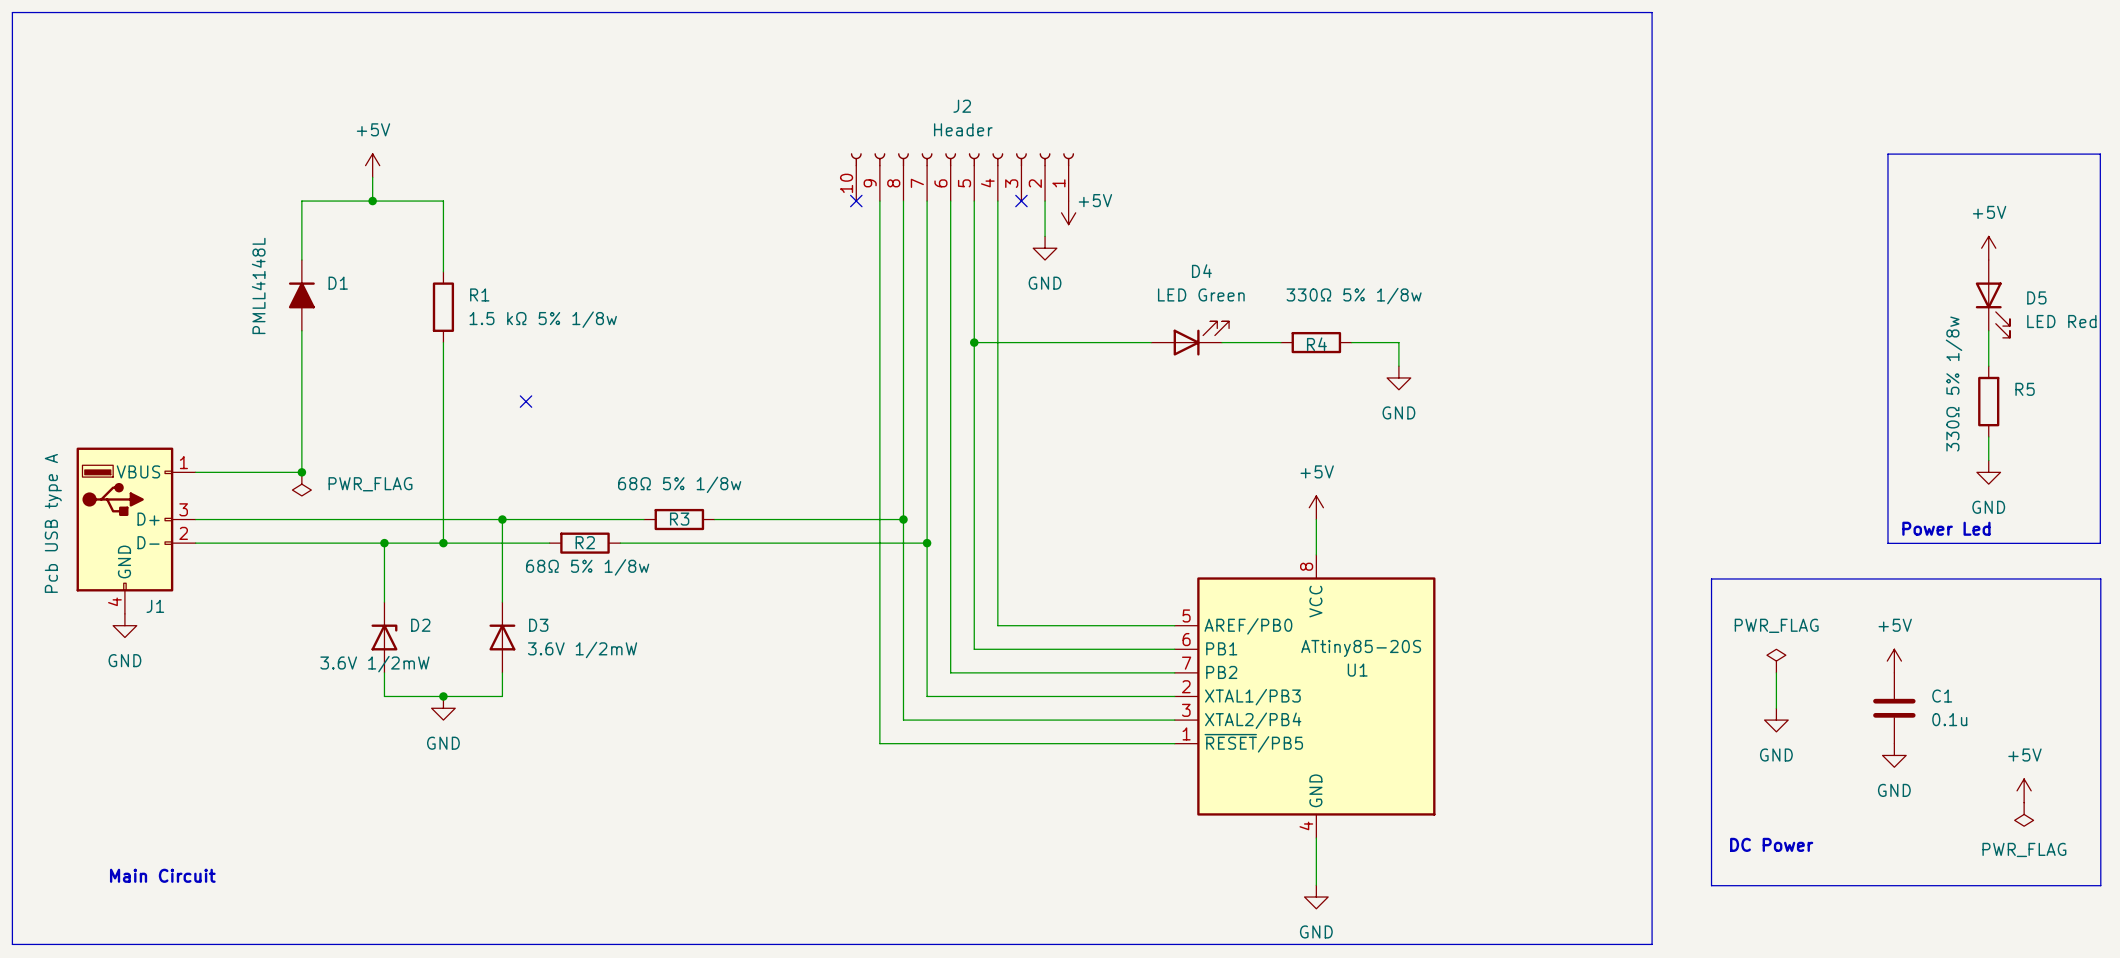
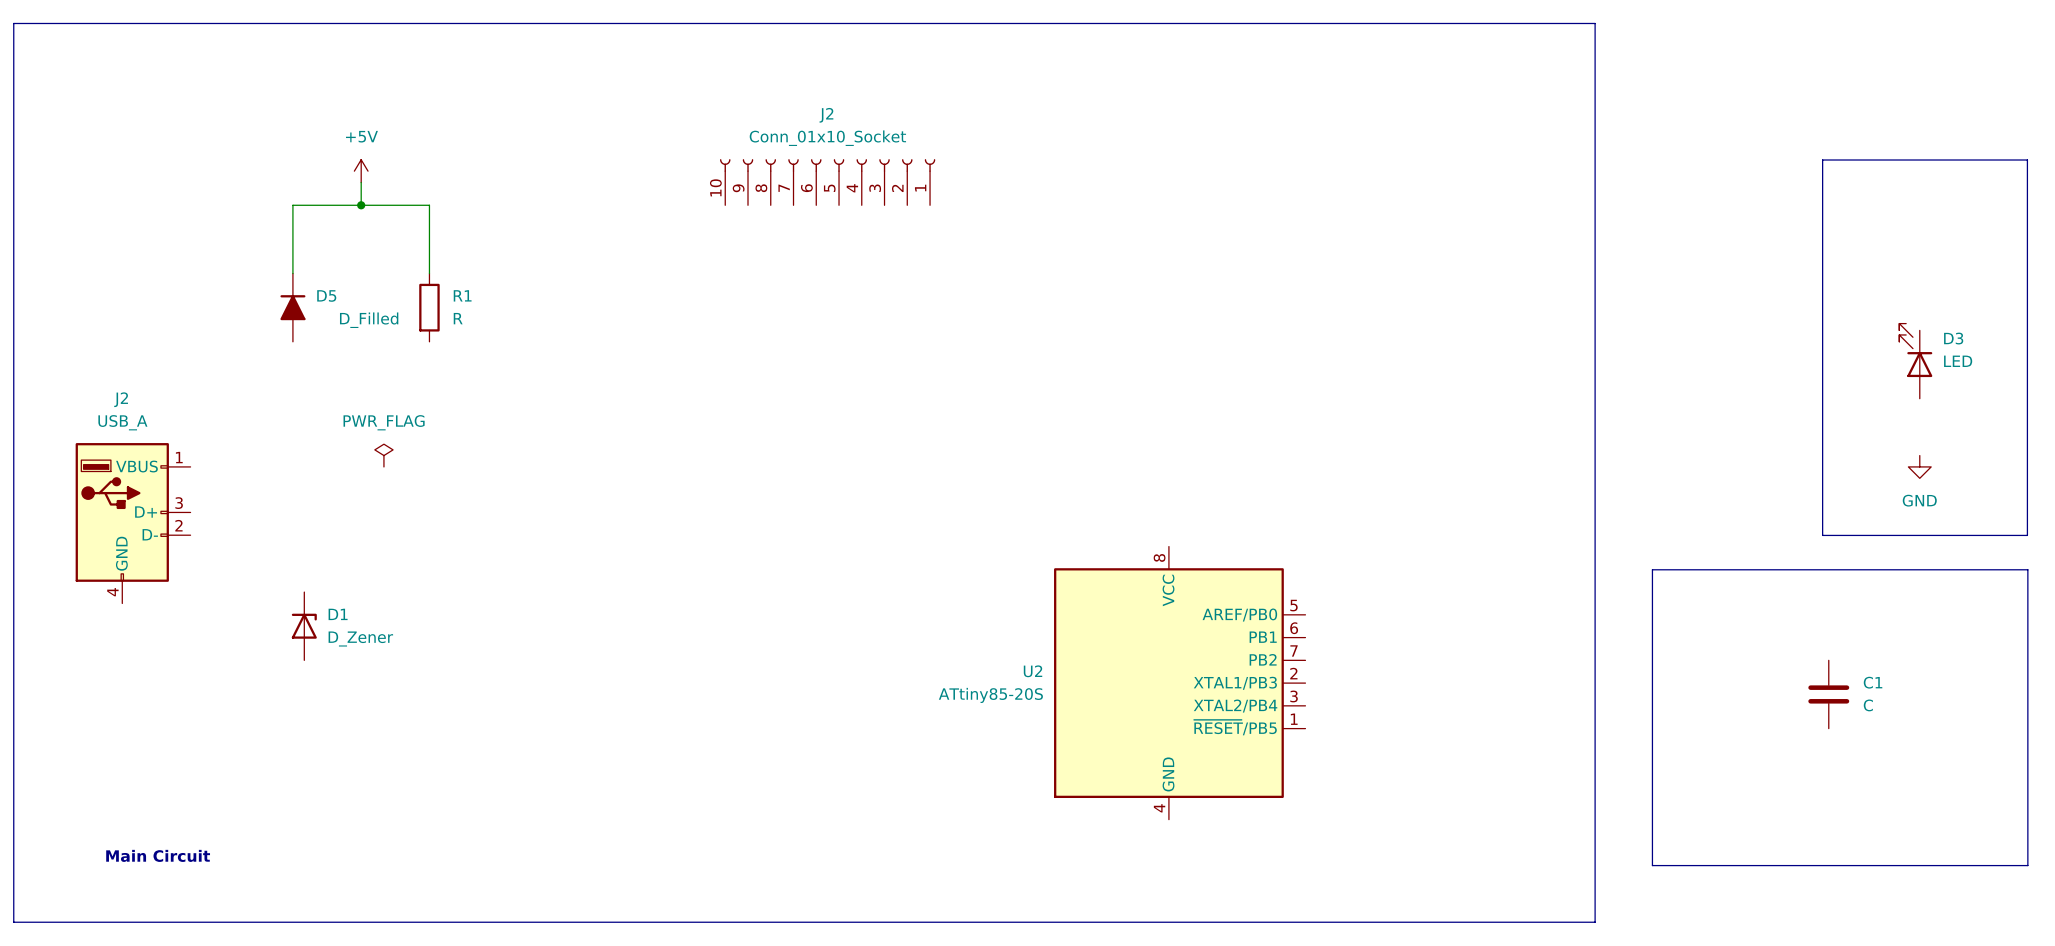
J2: none -> Conn_01x10_Socket (827, 182)
J2: Header (962, 177) -> none
no-connect mark: (856, 201) -> none
wire: (879, 201) (879, 743) (1174, 743) -> none
wire: (903, 201) (903, 720) (1174, 720) -> none
wire: (927, 201) (927, 696) (1174, 696) -> none
wire: (950, 201) (950, 672) (1174, 672) -> none
wire: (974, 201) (974, 649) (1174, 649) -> none
wire: (997, 201) (997, 625) (1174, 625) -> none
no-connect mark: (1021, 201) -> none
wire: (1045, 201) (1045, 236) -> none
power symbol: +5V (1068, 212) -> none
power symbol: GND (1045, 248) -> none
power symbol: +5V (1988, 248) -> none
D1 symbol: [288, 260, 315, 331] -> [291, 592, 317, 661]
D5 symbol: [1975, 260, 2010, 338] -> [280, 273, 306, 342]
D1 value: PMLL4148L (258, 285) -> D_Zener (360, 639)
R1 value: 1.5 kΩ 5% 1/8w (543, 319) -> R (458, 318)
D5 value: LED Red (2061, 321) -> D_Filled (369, 320)
wire: (301, 330) (301, 472) (195, 472) -> none
D4: LED Green (1190, 338) -> none
wire: (443, 342) (443, 543) -> none
wire: (974, 342) (1151, 342) -> none
junction: (974, 342) -> none
wire: (1221, 342) (1280, 342) -> none
R4: 330Ω 5% 1/8w (1316, 342) -> none
wire: (1351, 342) (1398, 342) (1398, 366) -> none
power symbol: GND (1398, 377) -> none
no-connect mark: (526, 401) -> none
R5: 330Ω 5% 1/8w (1988, 401) -> none
wire: (1988, 436) (1988, 460) -> none
junction: (301, 472) -> none
power symbol rotation: 0° (301, 484) -> 180° (383, 455)
power symbol position: PWR_FLAG (301, 484) -> PWR_FLAG (383, 455)
power symbol text position: PWR_FLAG (370, 484) -> PWR_FLAG (384, 422)
power symbol: +5V (1316, 507) -> none
wire: (195, 519) (643, 519) -> none
wire: (502, 519) (502, 602) -> none
junction: (502, 519) -> none
R3: 68Ω 5% 1/8w (679, 519) -> none
wire: (714, 519) (903, 519) -> none
junction: (903, 519) -> none
wire: (1316, 519) (1316, 554) -> none
J1 value: Pcb USB type A (53, 523) -> USB_A (122, 422)
text: Power Led (1946, 528) -> none
wire: (195, 543) (549, 543) -> none
wire: (384, 543) (384, 602) -> none
junction: (384, 543) -> none
junction: (443, 543) -> none
R2: 68Ω 5% 1/8w (584, 543) -> none
wire: (620, 543) (927, 543) -> none
junction: (927, 543) -> none
D3 symbol: [489, 602, 516, 673] -> [1899, 323, 1933, 399]
J1 name: J1 (155, 606) -> J2 (121, 399)
power symbol: GND (124, 625) -> none
D2: 3.6V 1/2mW (384, 637) -> none
D3 value: 3.6V 1/2mW (582, 649) -> LED (1958, 361)
power symbol: PWR_FLAG (1776, 661) -> none
power symbol: +5V (1894, 661) -> none
wire: (384, 672) (384, 696) (502, 696) (502, 672) -> none
wire: (1776, 672) (1776, 708) -> none
junction: (443, 696) -> none
U2: none -> ATtiny85-20S (1179, 683)
U1: ATtiny85-20S (1305, 696) -> none
power symbol: GND (443, 708) -> none
C1 value: 0.1u (1949, 719) -> C (1868, 705)
power symbol: GND (1776, 720) -> none
power symbol: GND (1894, 755) -> none
power symbol: +5V (2024, 790) -> none
power symbol: PWR_FLAG (2024, 814) -> none
wire: (1316, 838) (1316, 885) -> none
text: DC Power (1771, 844) -> none
power symbol: GND (1316, 897) -> none

